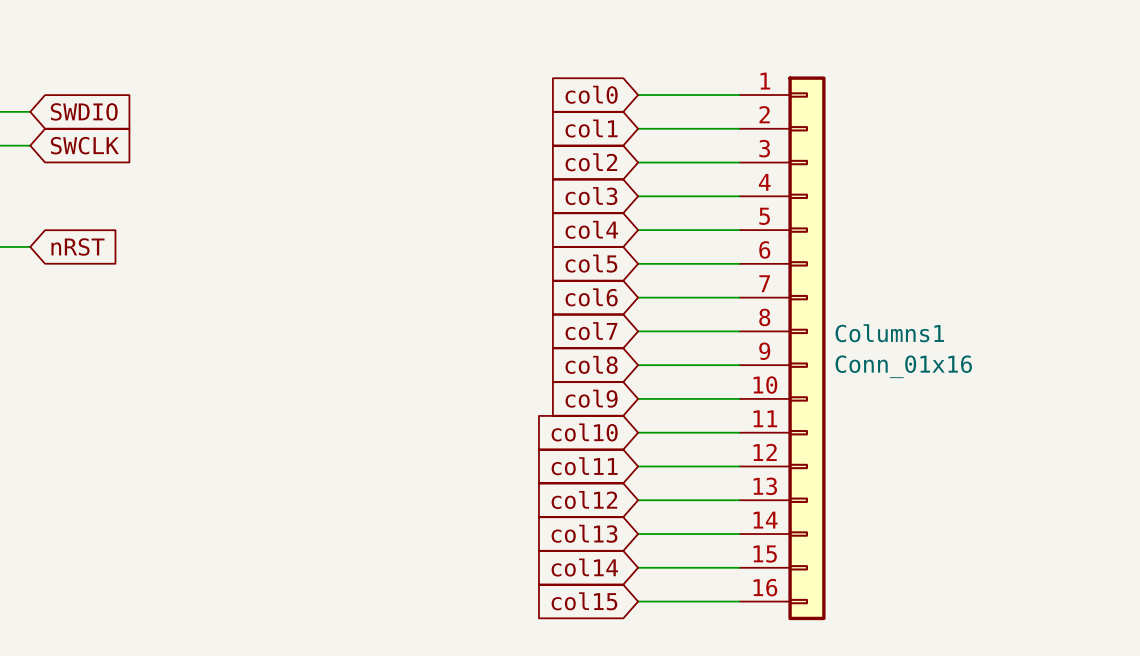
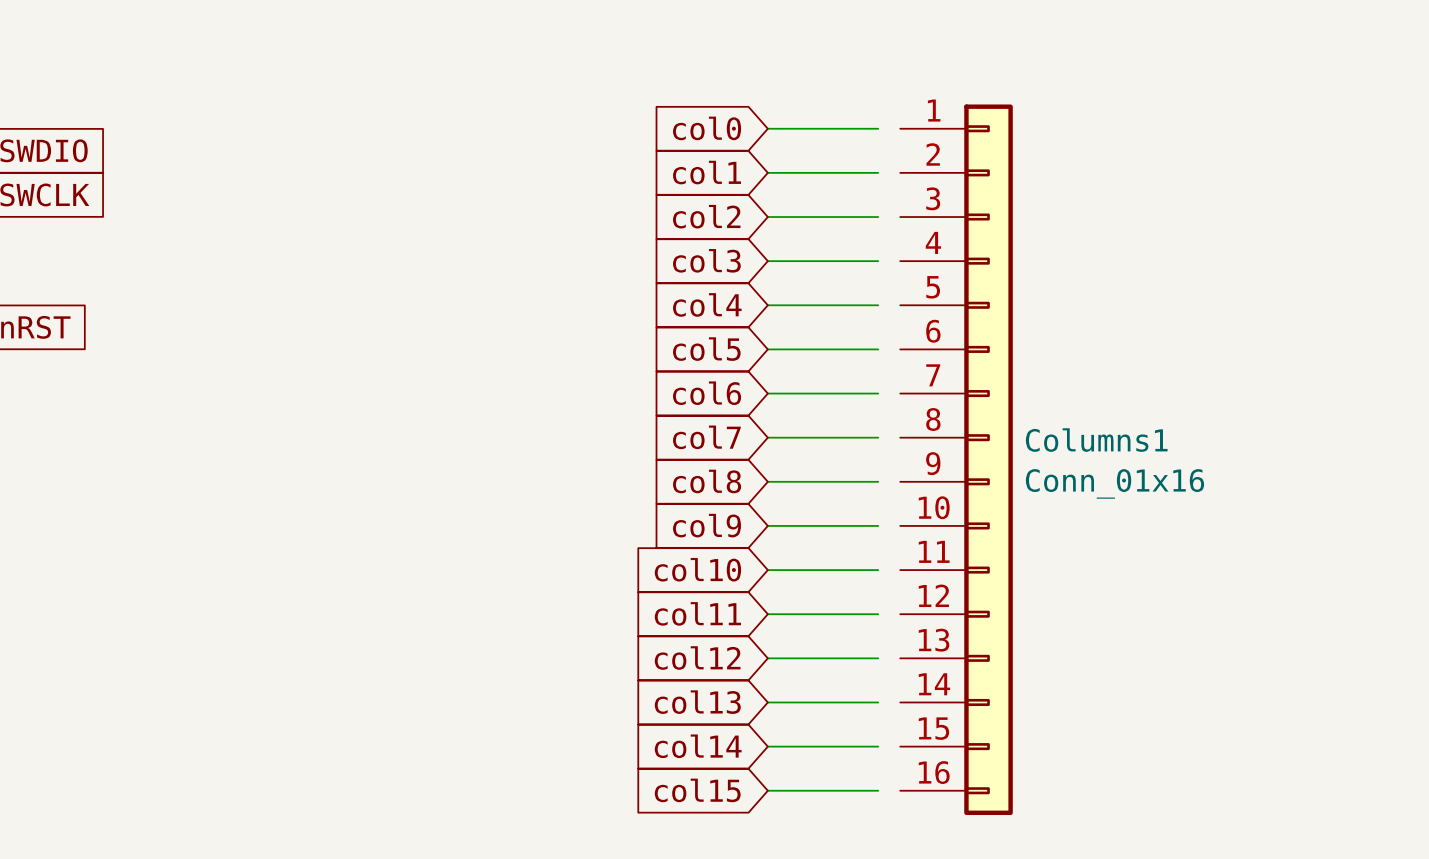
wire: (722, 95) (739, 95) -> none
wire: (722, 128) (739, 128) -> none
wire: (722, 162) (739, 162) -> none
wire: (722, 196) (739, 196) -> none
wire: (722, 230) (739, 230) -> none
wire: (722, 263) (739, 263) -> none
wire: (722, 297) (739, 297) -> none
wire: (722, 331) (739, 331) -> none
wire: (722, 365) (739, 365) -> none
wire: (722, 398) (739, 398) -> none
wire: (722, 432) (739, 432) -> none
wire: (722, 466) (739, 466) -> none
wire: (722, 500) (739, 500) -> none
wire: (722, 534) (739, 534) -> none
wire: (722, 567) (739, 567) -> none
wire: (722, 601) (739, 601) -> none

